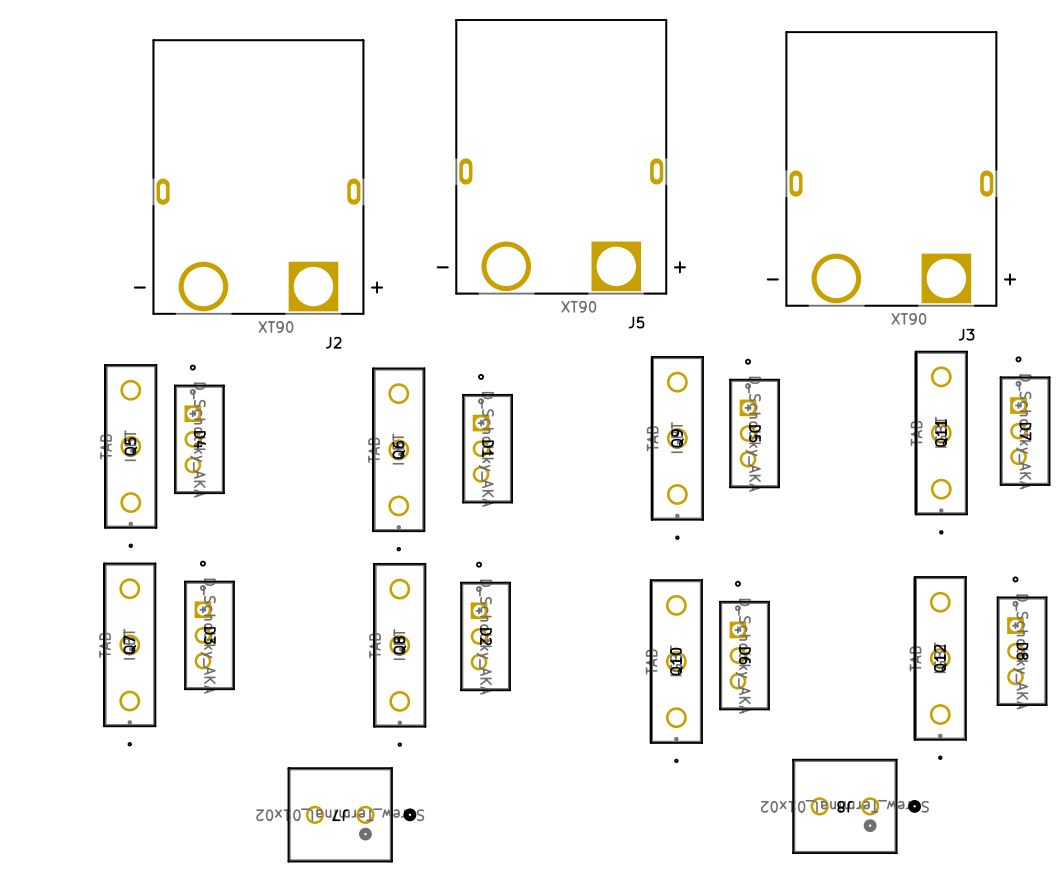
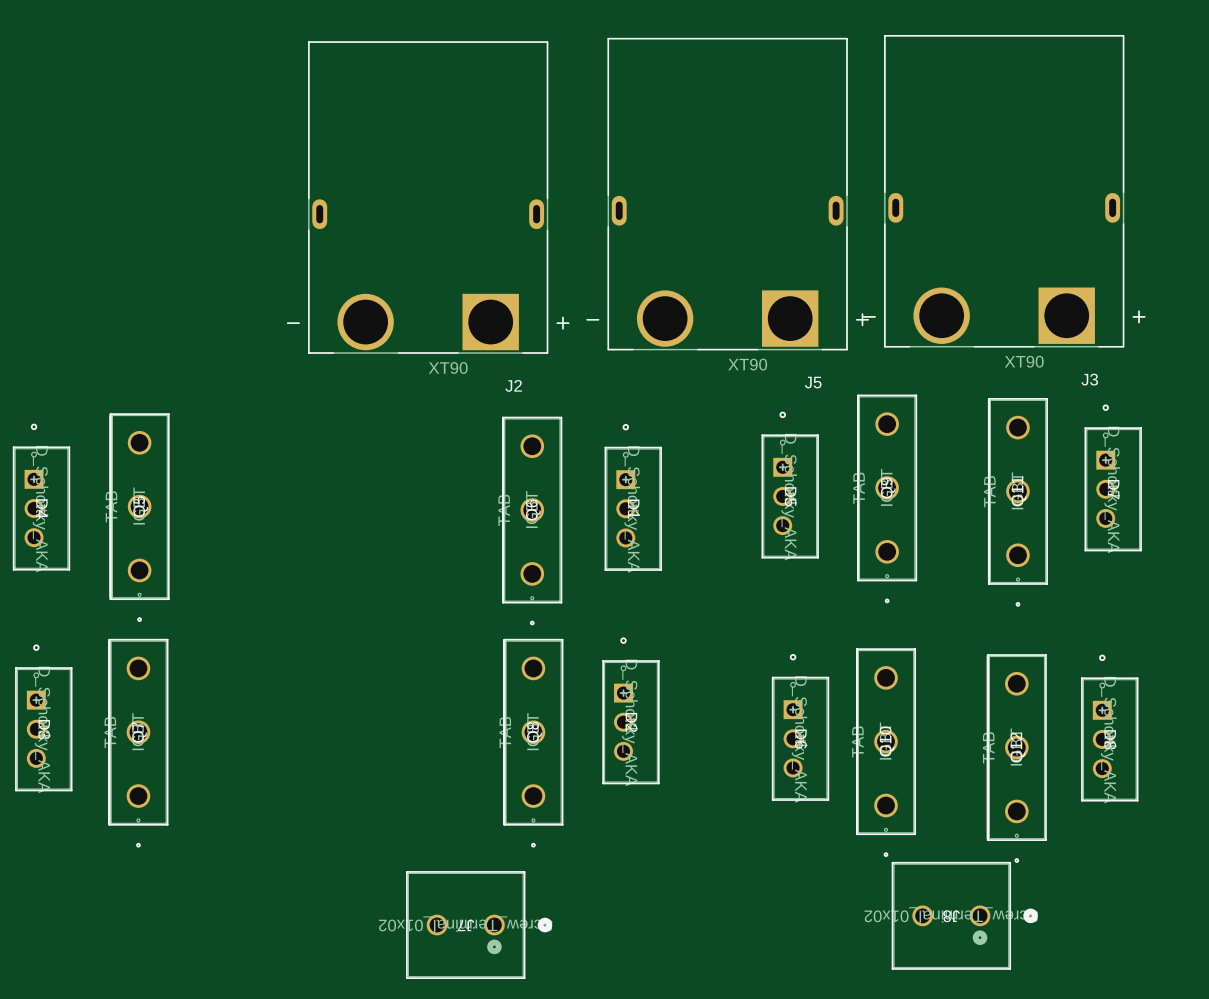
J5 position: (561, 156) -> (727, 194)
J2 position: (258, 177) -> (428, 197)
D7 position: (1025, 421) -> (1113, 477)
D5 position: (754, 423) -> (790, 485)
D4 position: (199, 429) -> (41, 497)
D1 position: (487, 438) -> (633, 497)
Q11 position: (941, 442) -> (1017, 502)
Q9 position: (677, 447) -> (887, 498)
Q6 position: (398, 459) -> (532, 521)
D3 position: (209, 625) -> (43, 717)
D2 position: (485, 626) -> (630, 710)
D8 position: (1022, 641) -> (1109, 728)
D6 position: (744, 645) -> (800, 727)
Q8 position: (399, 654) -> (533, 743)
Q12 position: (940, 667) -> (1016, 758)
Q10 position: (676, 671) -> (886, 752)
J7 position: (352, 814) -> (479, 925)

